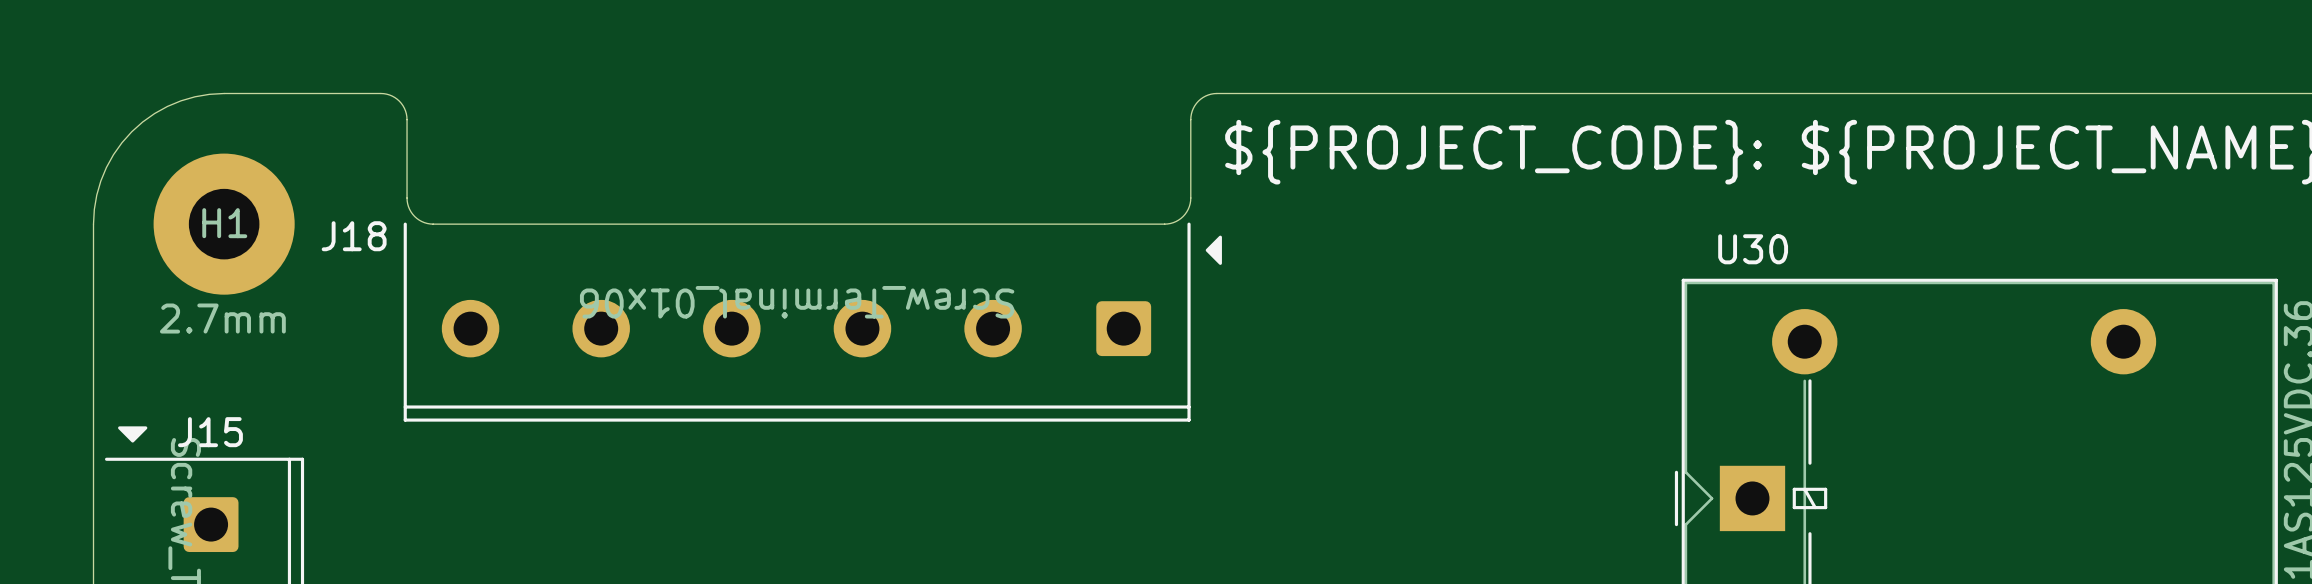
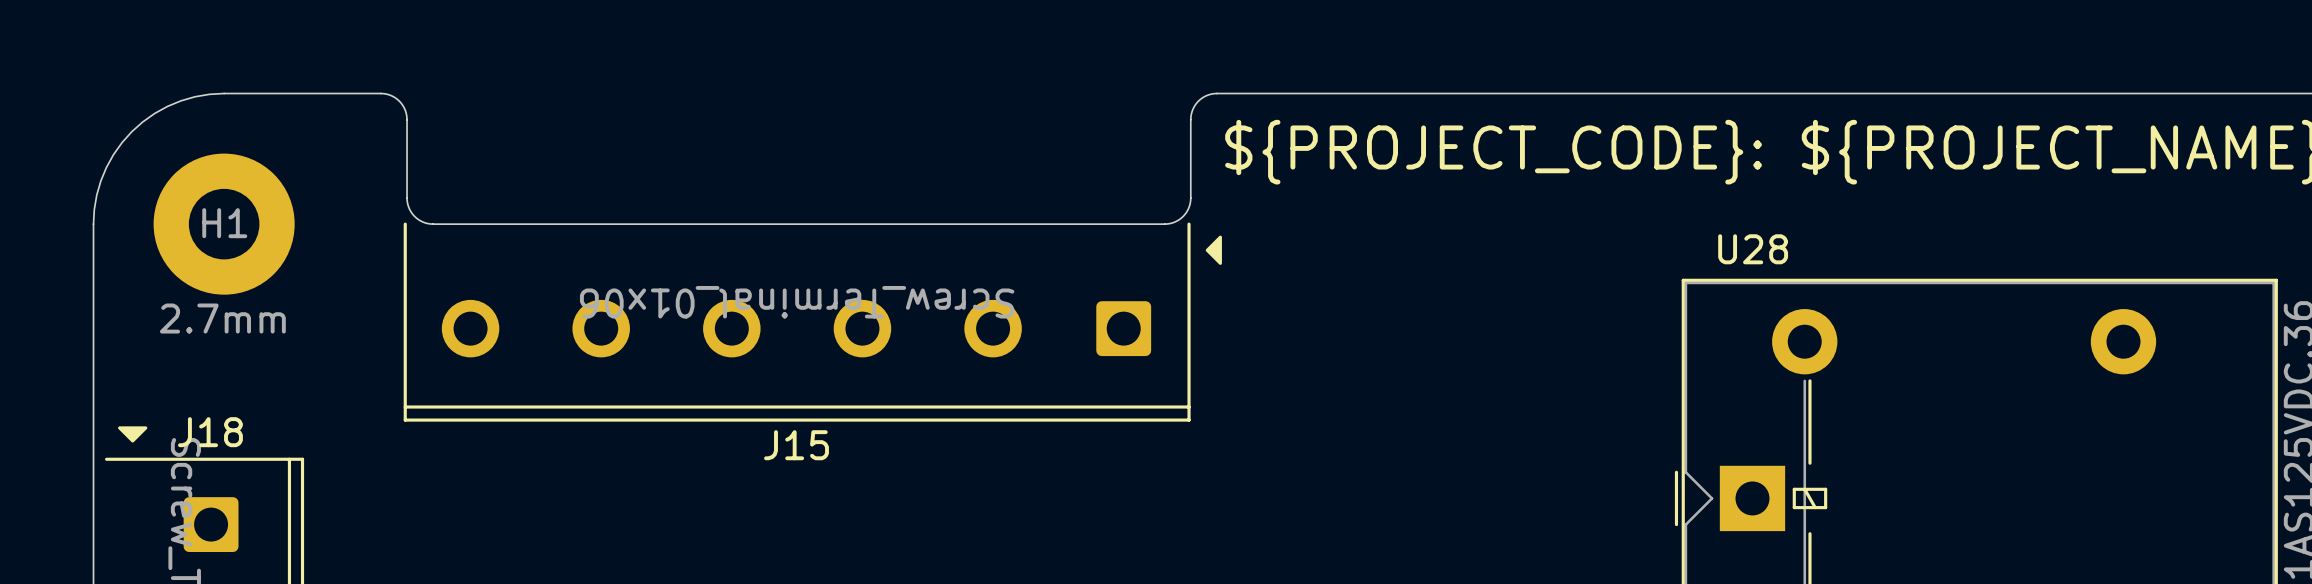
J18 name: J18 (354, 236) -> J15 (796, 445)
U30 name: U30 (1753, 249) -> U28 (1753, 249)
J15 name: J15 (210, 432) -> J18 (210, 432)

